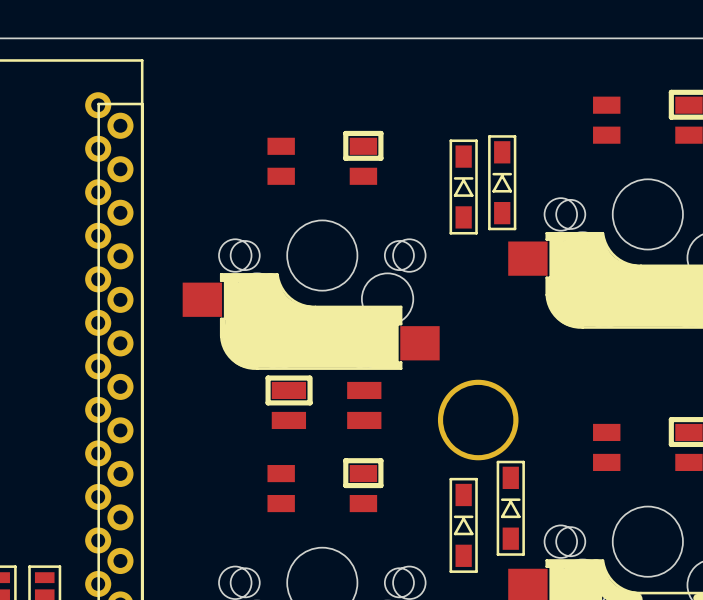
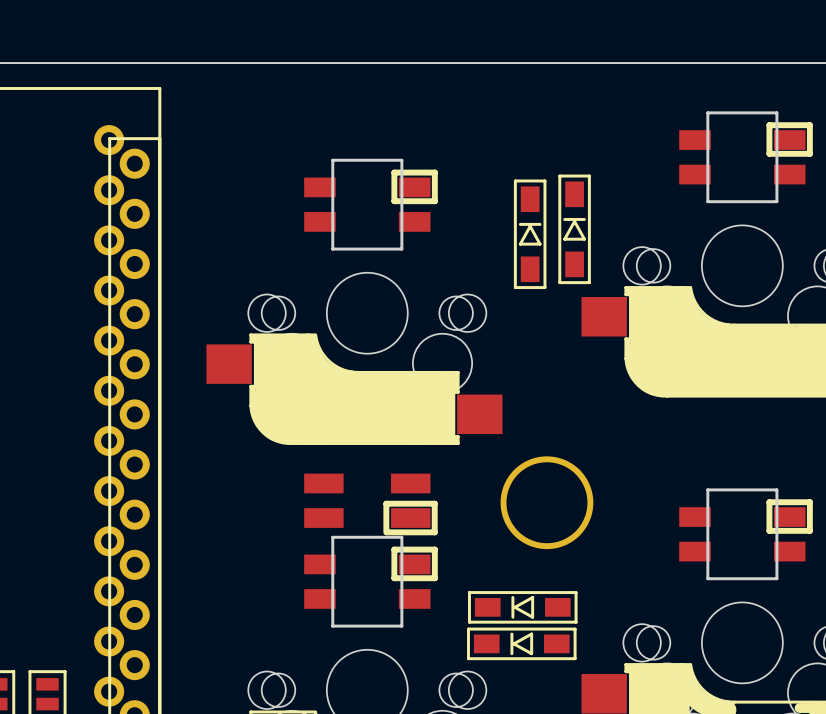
board edge: none -> (707, 112) (707, 201) (776, 201) (776, 112) (707, 112)
board edge: none -> (332, 160) (332, 249) (401, 249) (401, 160) (332, 160)
part rotation: 0° (323, 402) -> 180° (370, 504)
board edge: none -> (707, 489) (707, 578) (776, 578) (776, 489) (707, 489)
board edge: none -> (332, 537) (332, 626) (401, 626) (401, 537) (332, 537)
part: (510, 508) -> none
part: none -> (522, 607)
part: (463, 525) -> none
part: none -> (521, 643)

